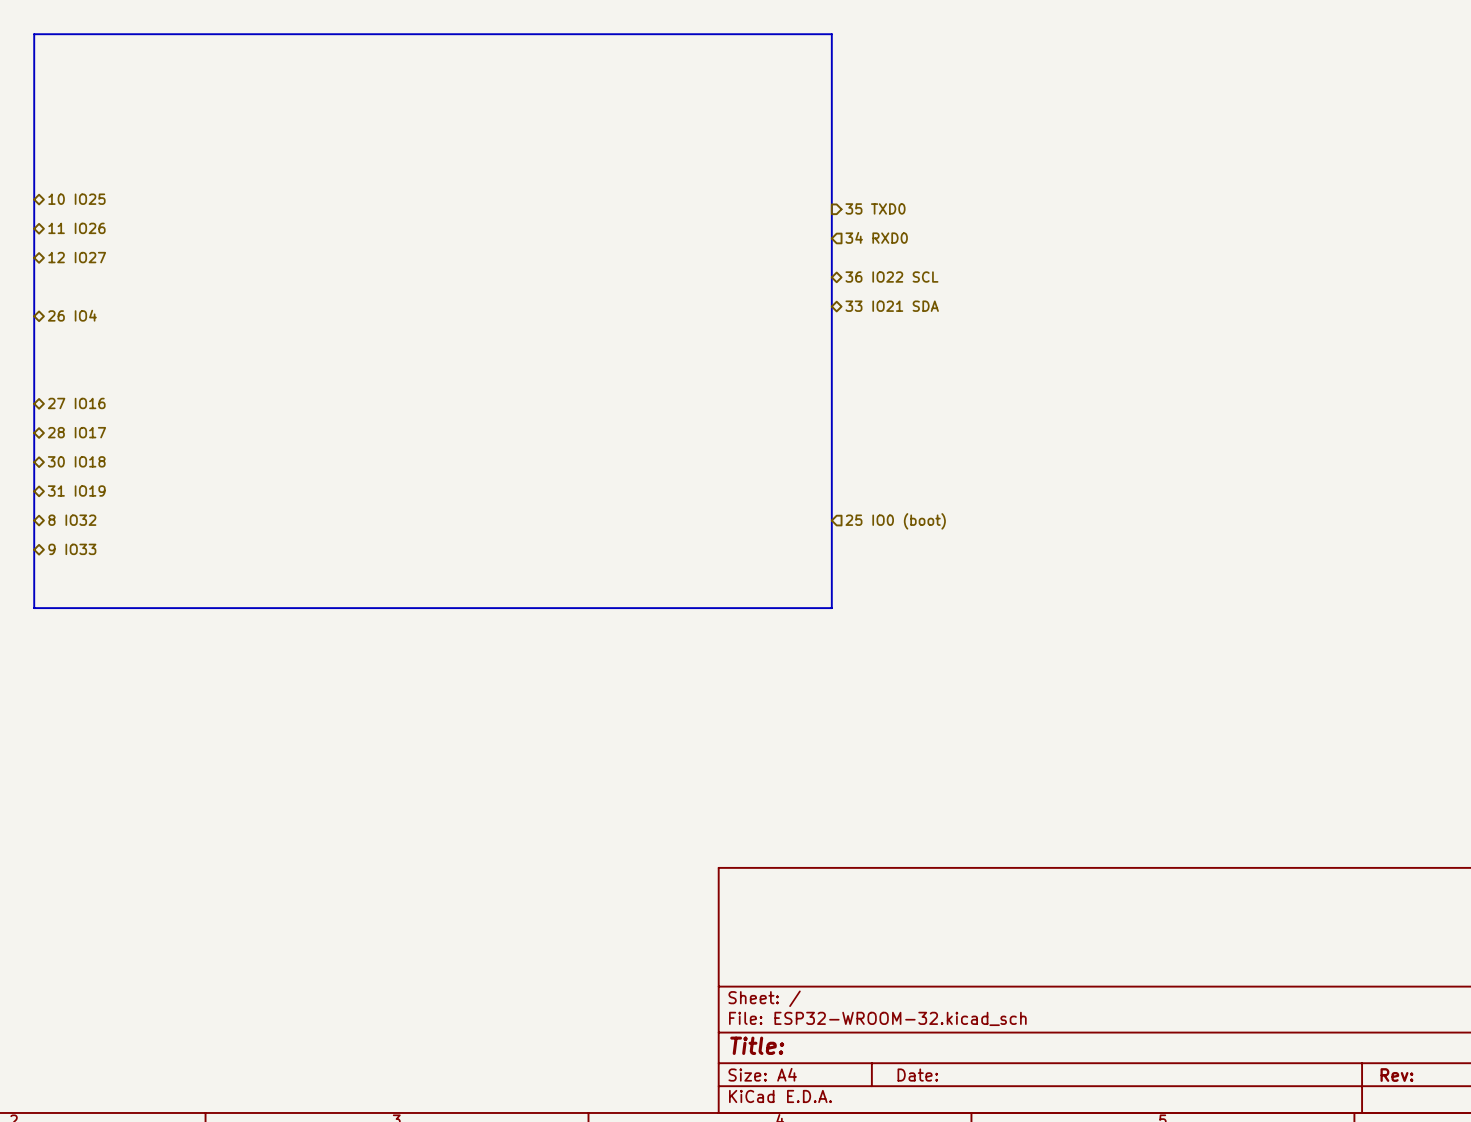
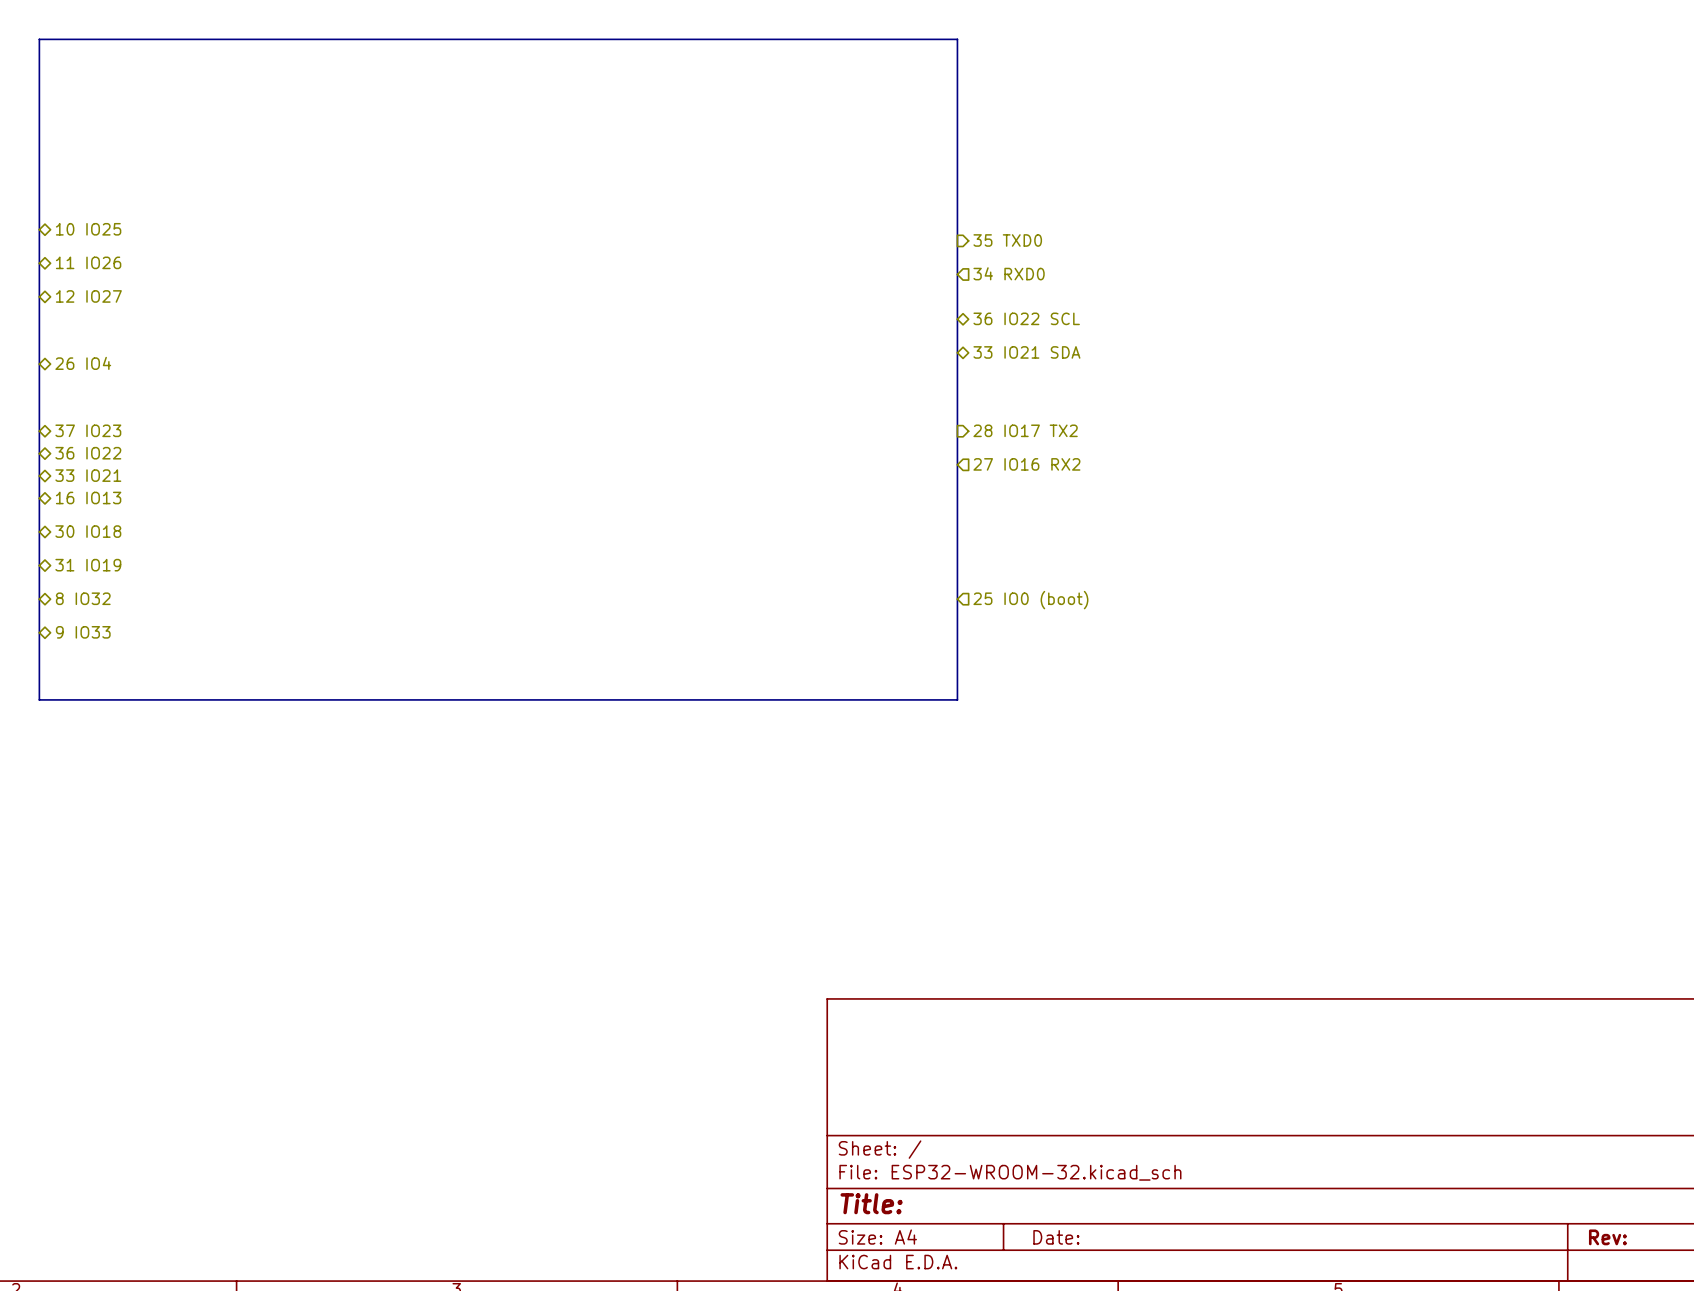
hierarchical label: none -> 37 IO23 (88, 430)
hierarchical label: none -> 28 IO17 TX2 (1025, 430)
hierarchical label: none -> 36 IO22 (88, 453)
hierarchical label: 27 IO16 (76, 403) -> none
hierarchical label: none -> 27 IO16 RX2 (1026, 464)
hierarchical label: none -> 33 IO21 (88, 475)
hierarchical label: 28 IO17 (76, 432) -> 16 IO13 (88, 497)

